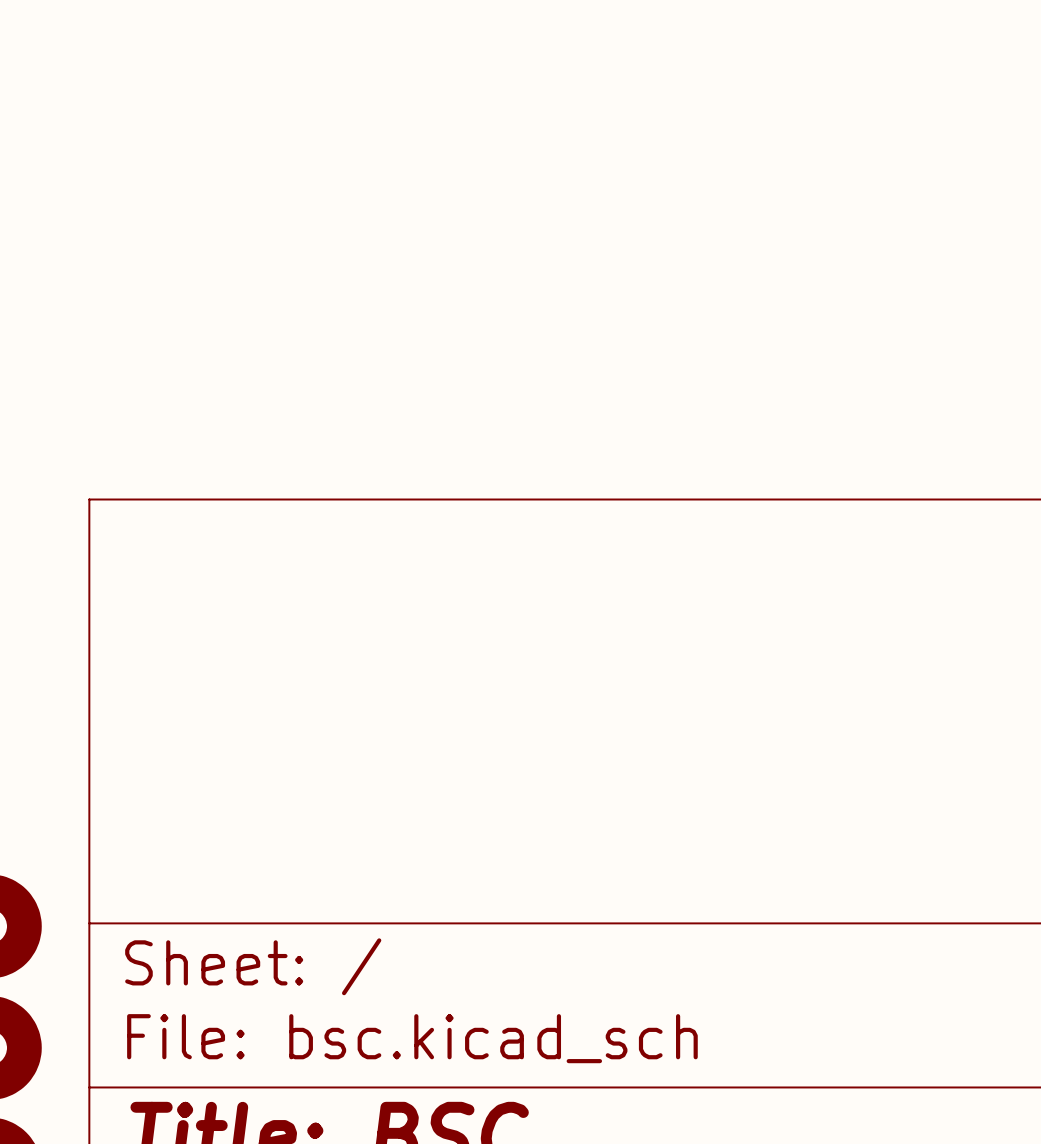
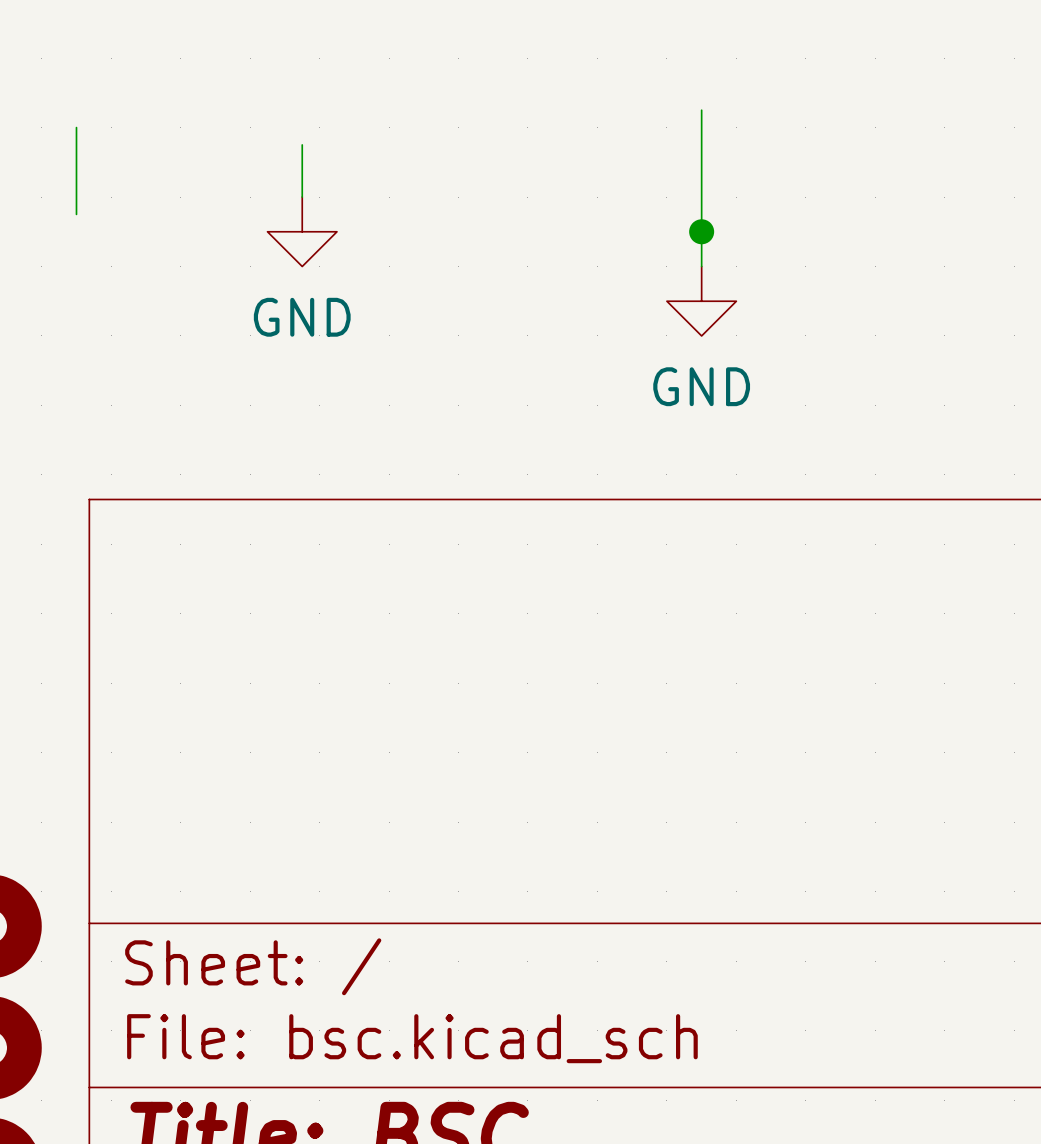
wire: none -> (701, 110) (701, 266)
wire: none -> (76, 127) (76, 214)
wire: none -> (302, 144) (302, 197)
power symbol: none -> GND (302, 231)
junction: none -> (701, 231)
power symbol: none -> GND (701, 301)

